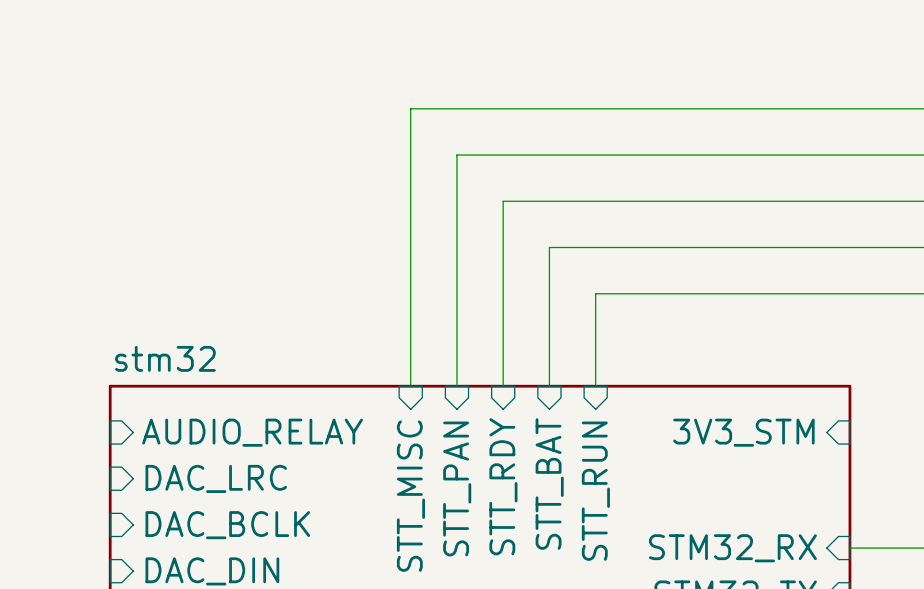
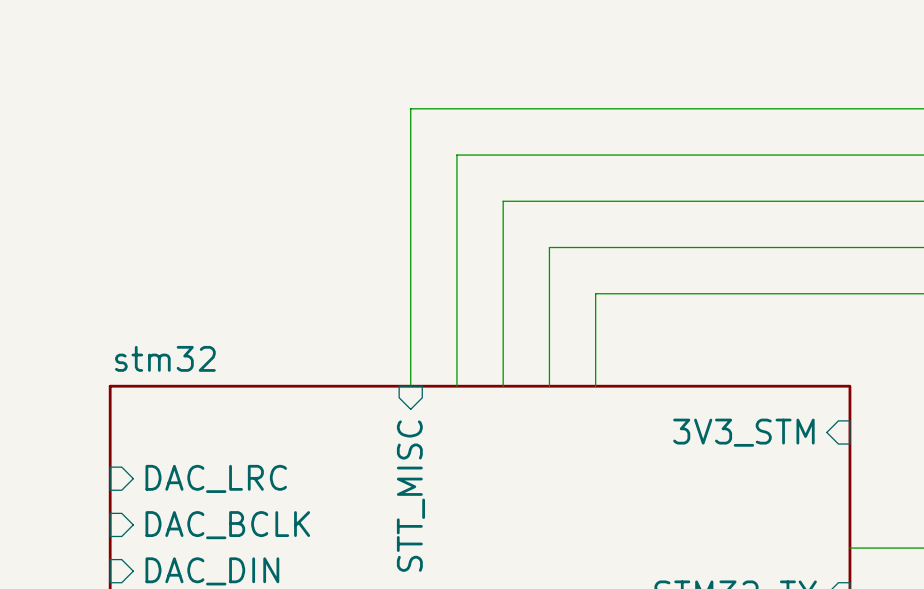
sheet pin: AUDIO_RELAY (252, 432) -> none
sheet pin: STT_BAT (549, 484) -> none
sheet pin: STT_RDY (503, 486) -> none
sheet pin: STT_PAN (457, 488) -> none
sheet pin: STT_RUN (595, 491) -> none
sheet pin: STM32_RX (732, 548) -> none

